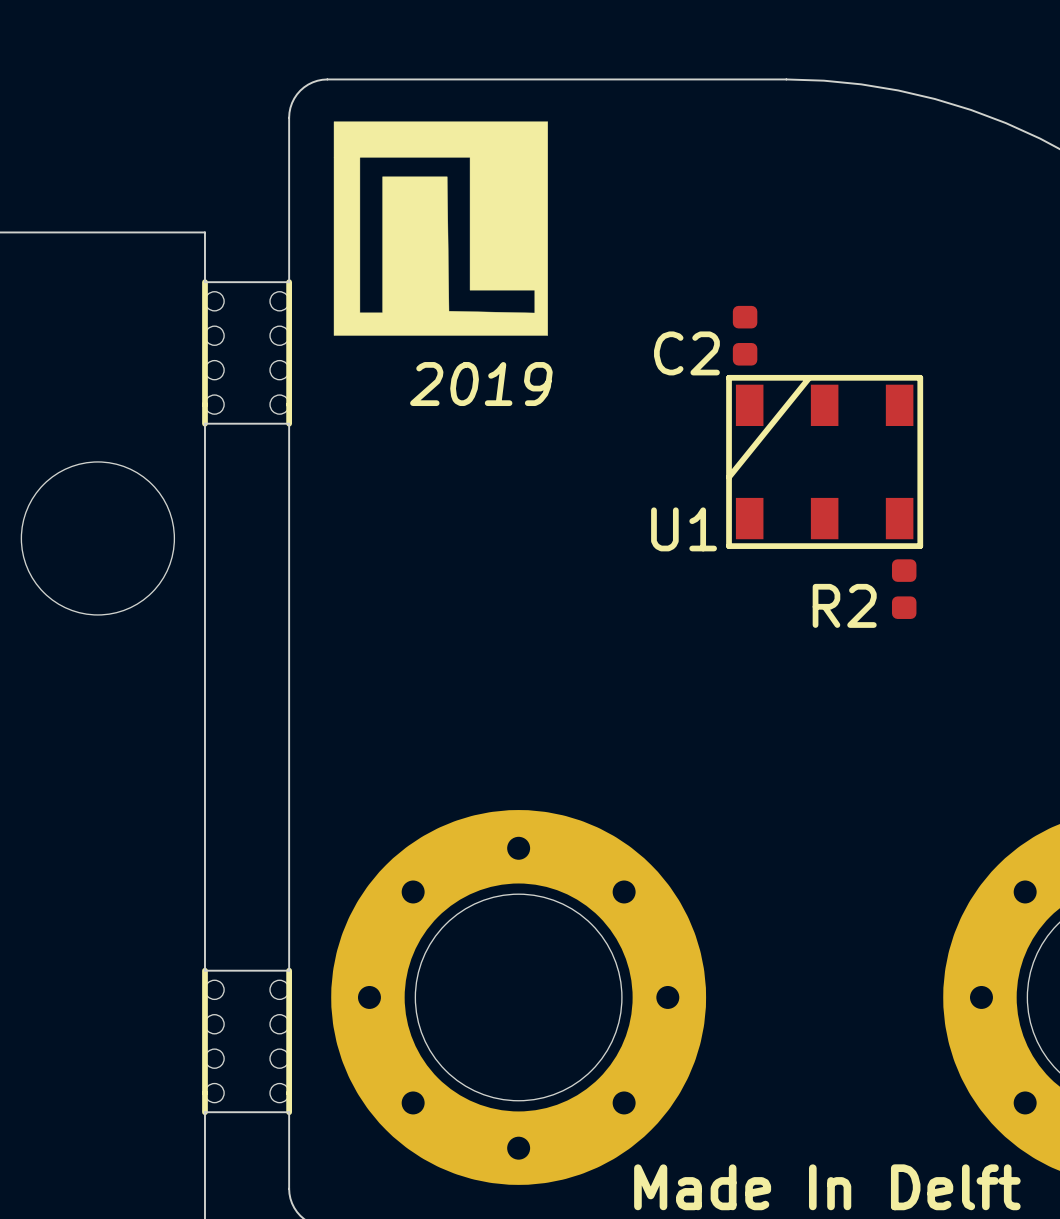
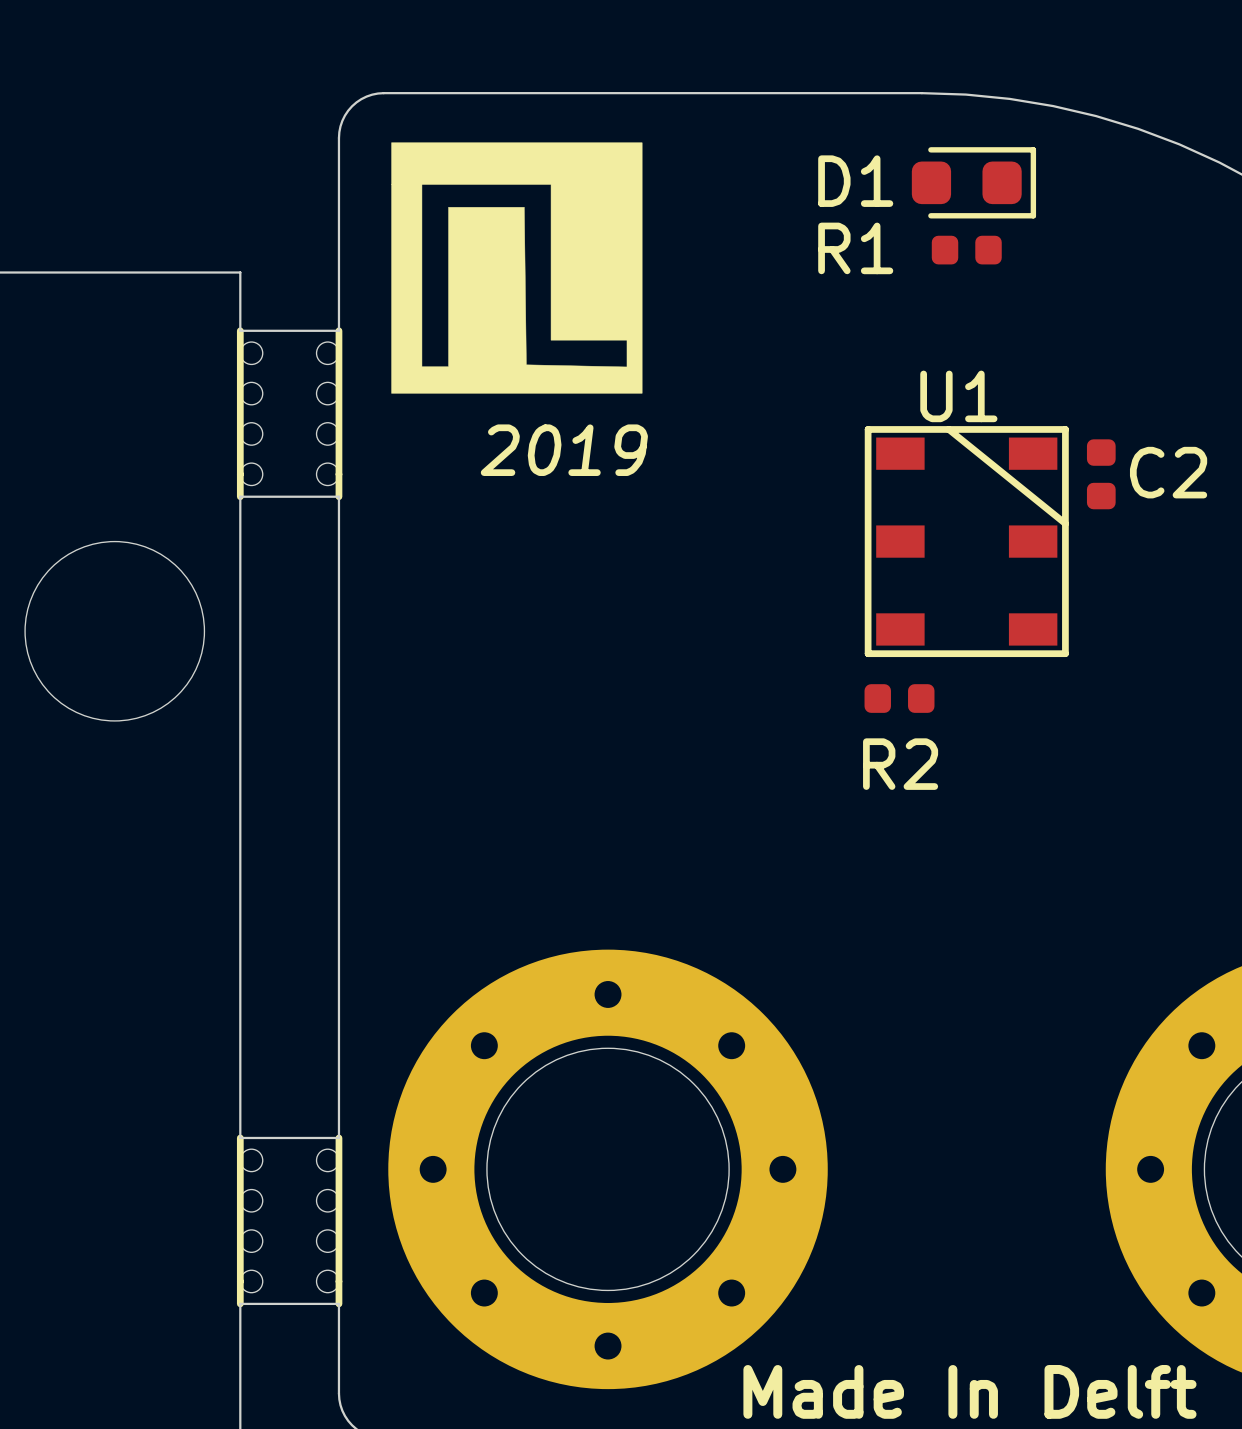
D1: none -> (973, 182)
R1: none -> (966, 250)
C2 position: (745, 335) -> (1101, 474)
C2 name position: C2 (686, 353) -> C2 (1168, 472)
U1 rotation: 0° (824, 461) -> 90° clockwise (966, 541)
R2 rotation: 0° (904, 589) -> 90° clockwise (899, 698)
R2 position: (904, 589) -> (899, 698)

